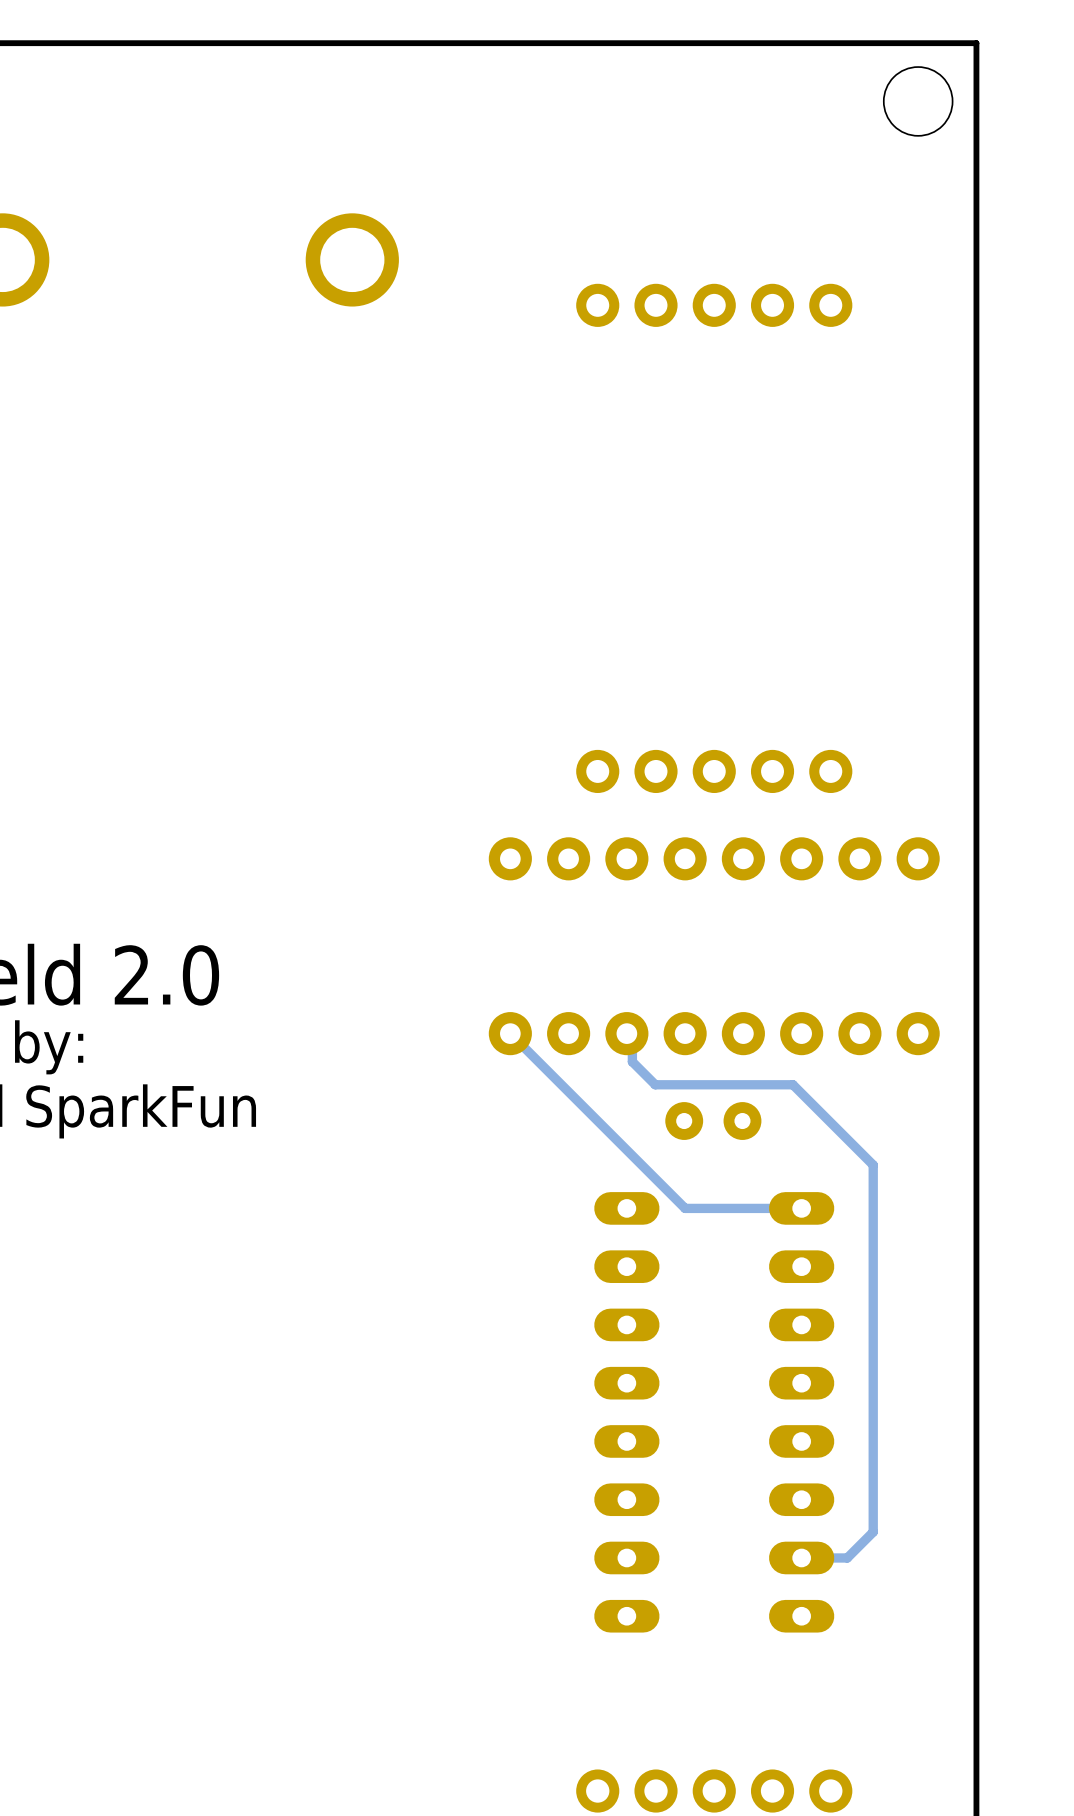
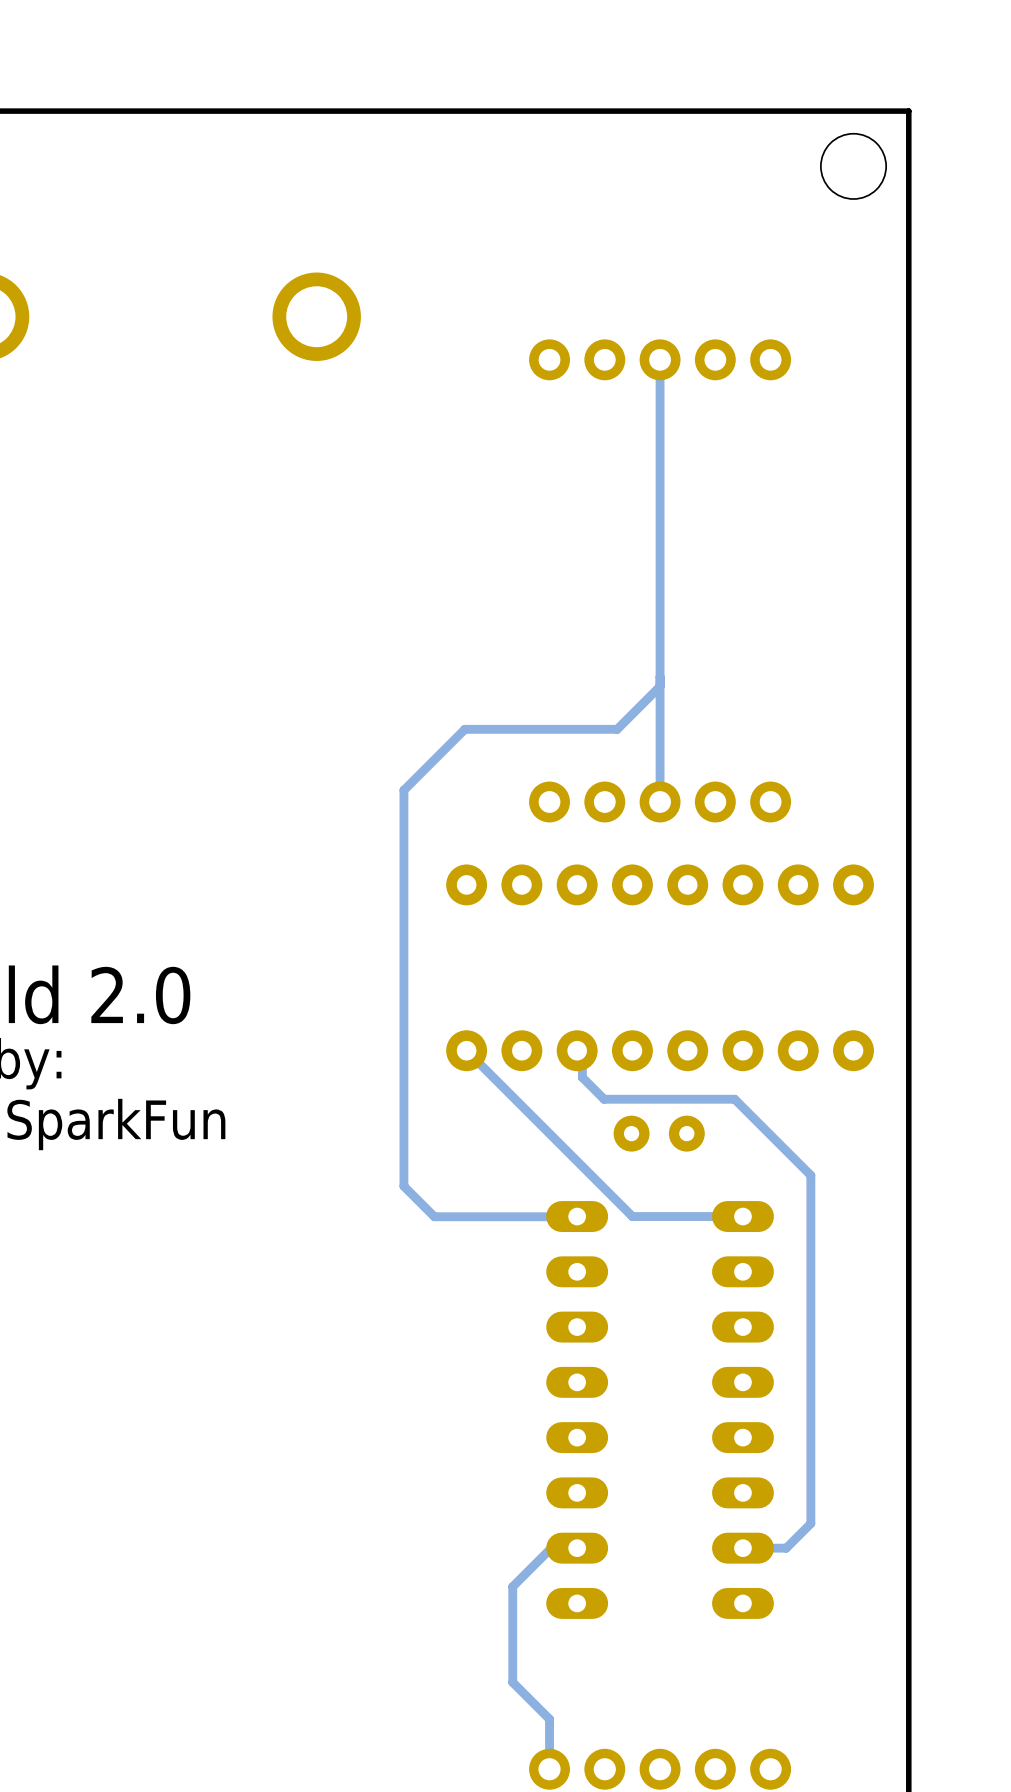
track: none -> (660, 359) (660, 802)
track: none -> (660, 686) (617, 729) (464, 729) (403, 790) (403, 1186) (434, 1216) (576, 1216)
track: none -> (577, 1548) (551, 1547) (512, 1586) (512, 1682) (549, 1719) (549, 1769)

